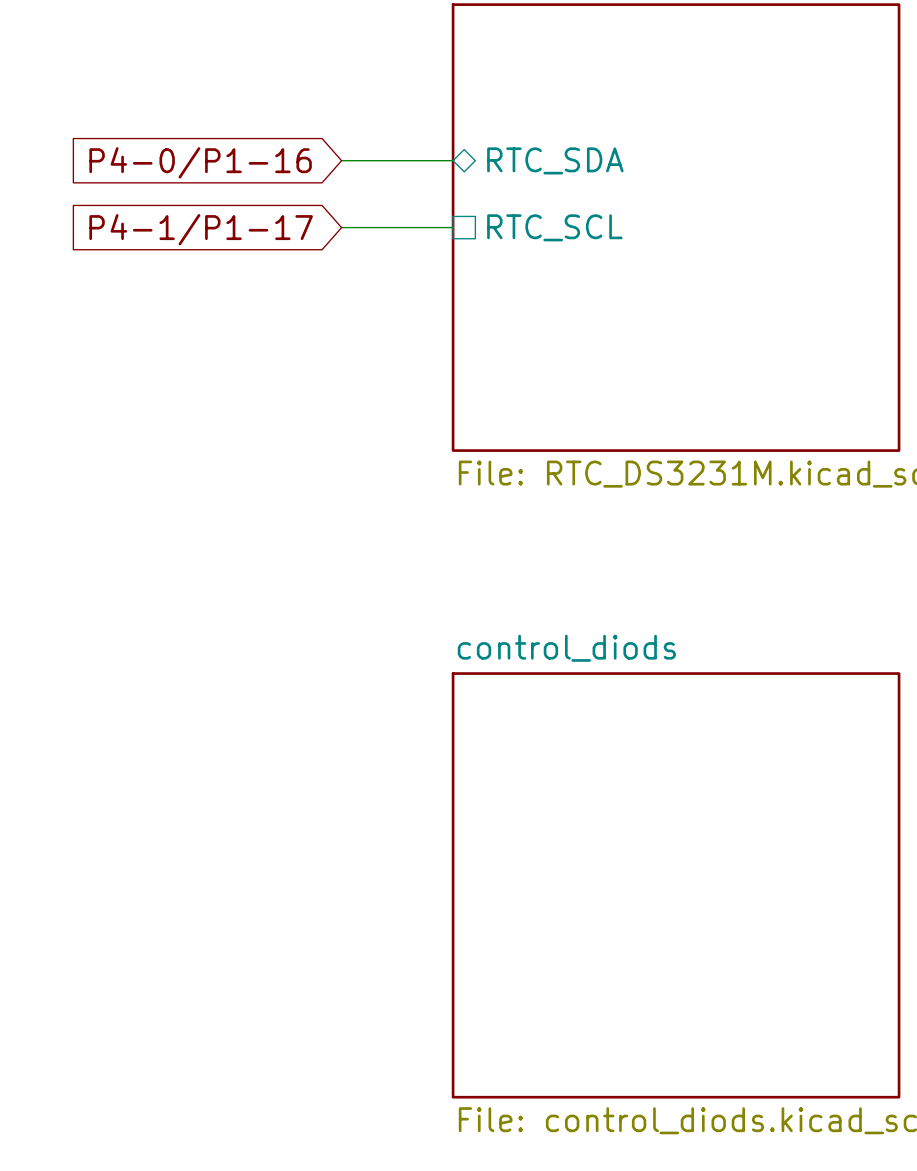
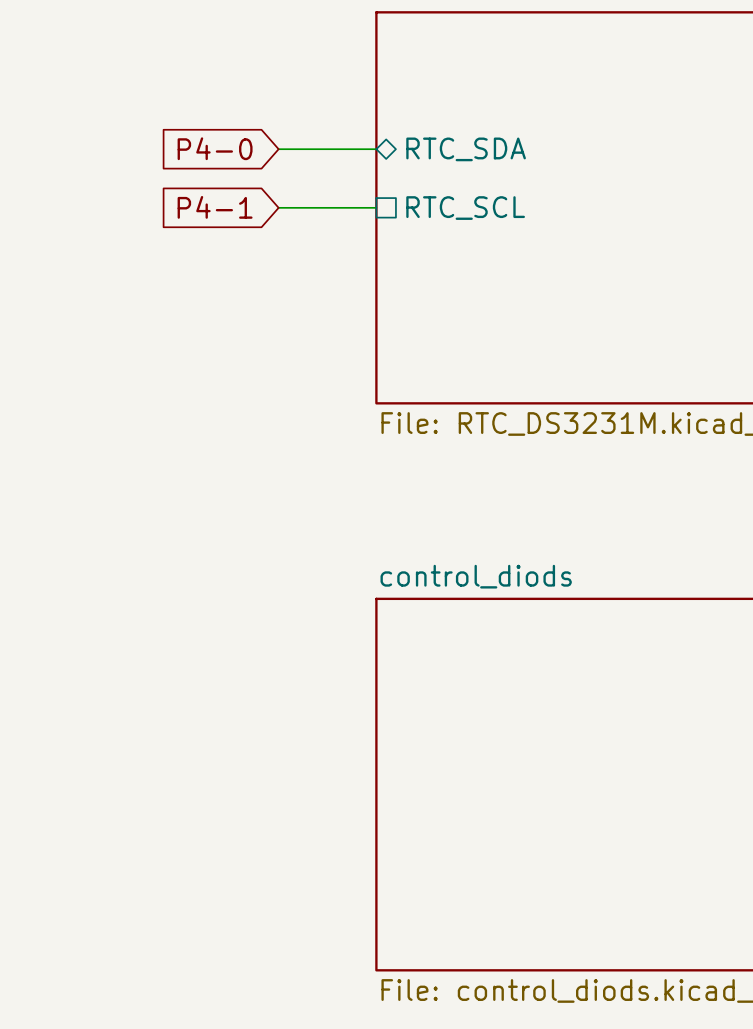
global label: P4-0/P1-16 (200, 162) -> P4-0 (215, 148)
global label: P4-1/P1-17 (201, 229) -> P4-1 (215, 207)

